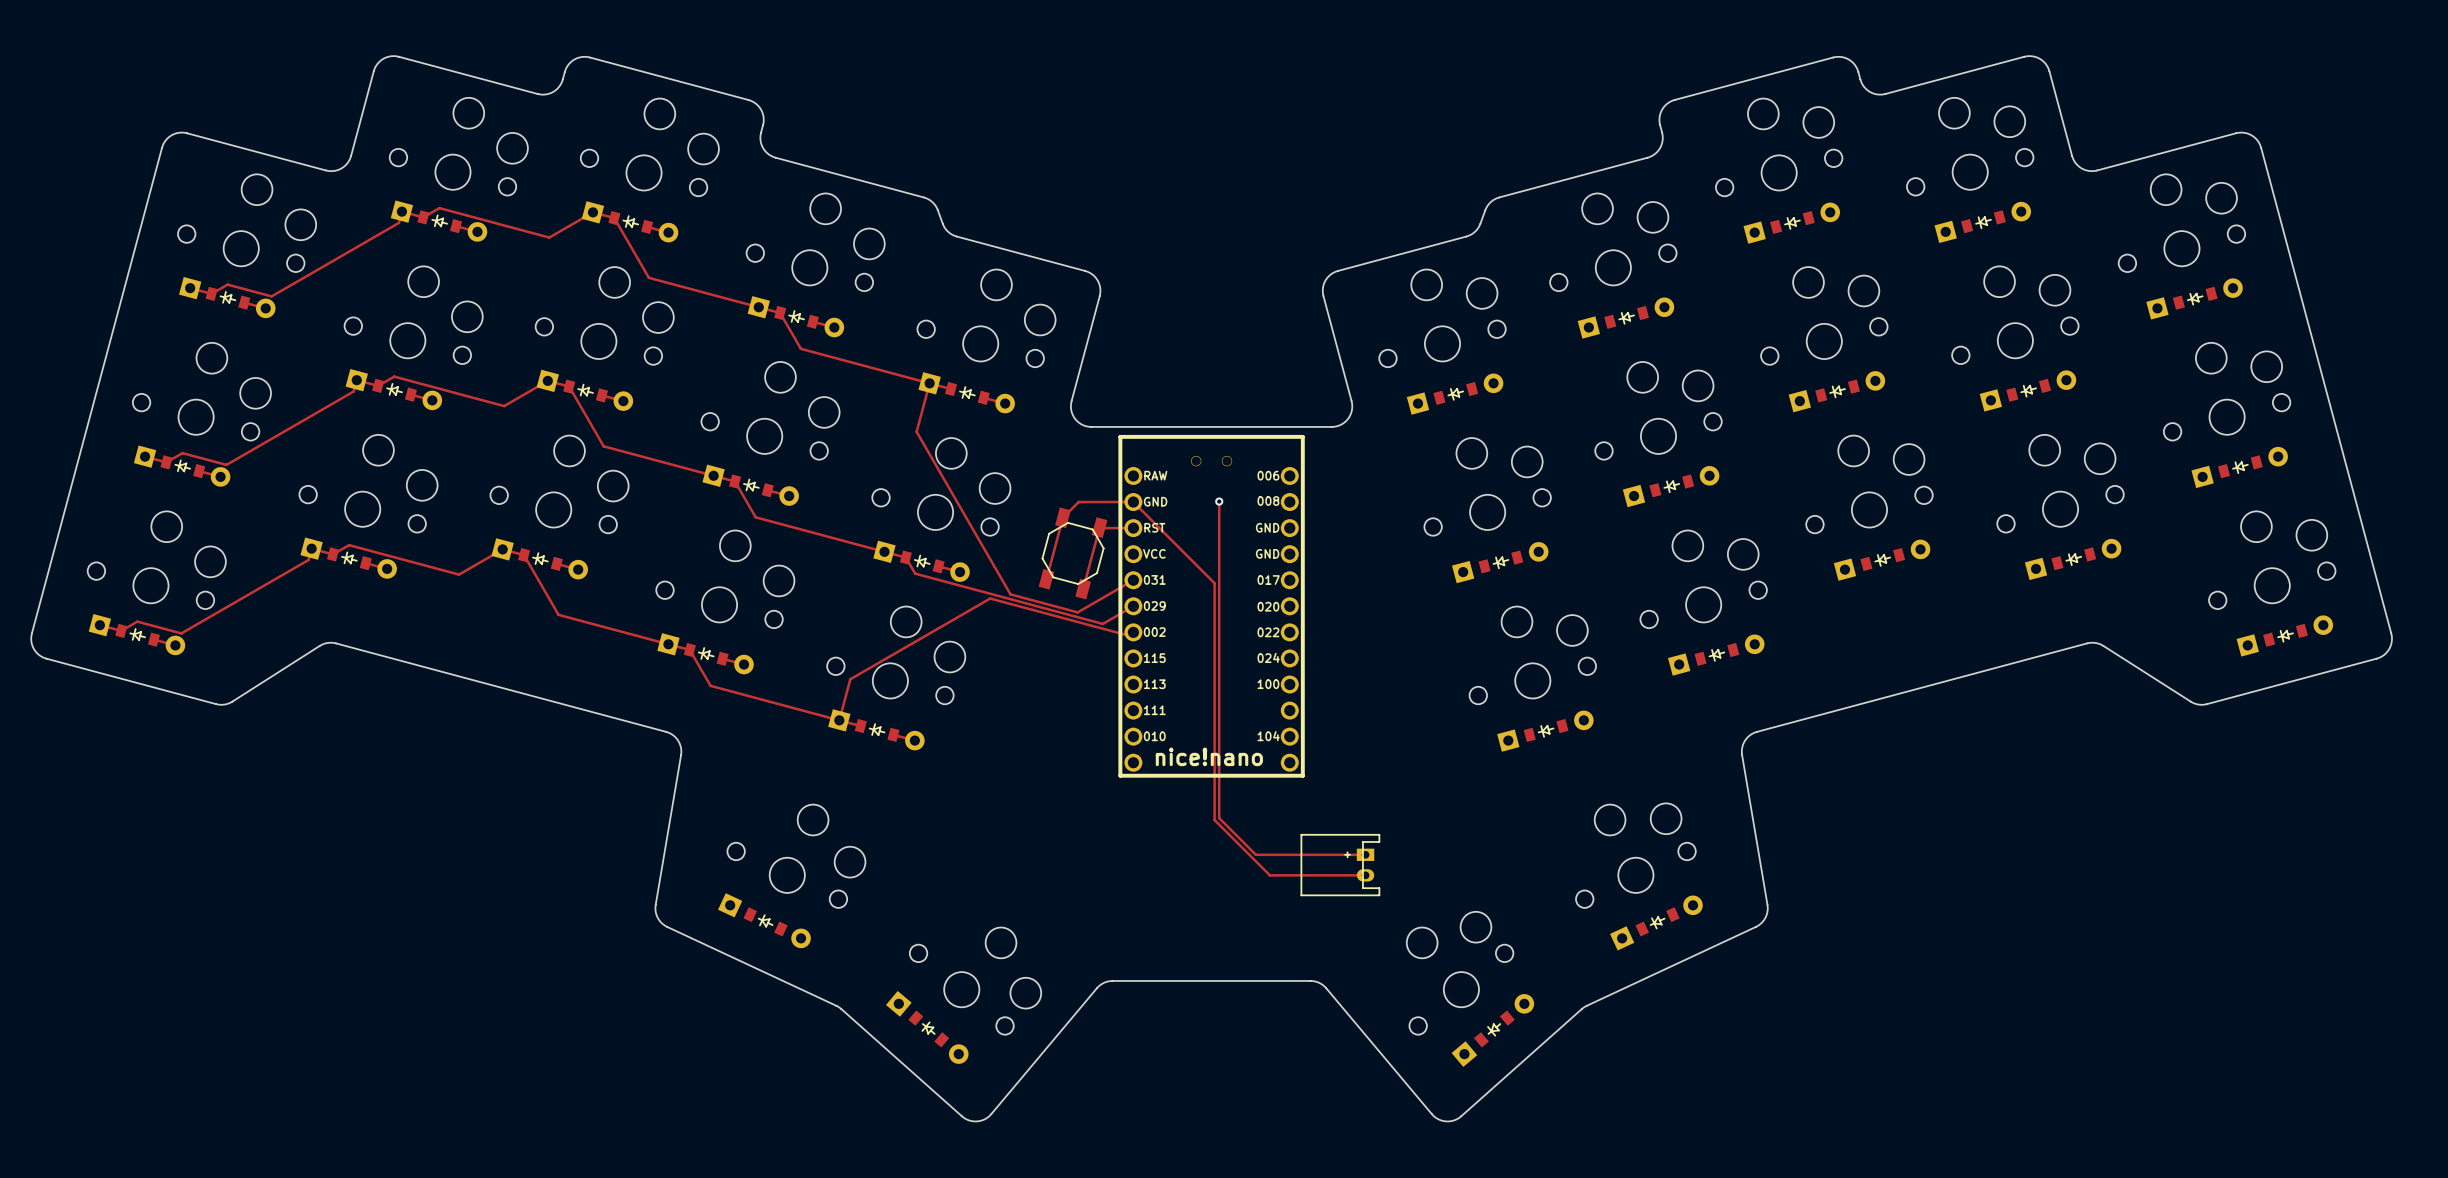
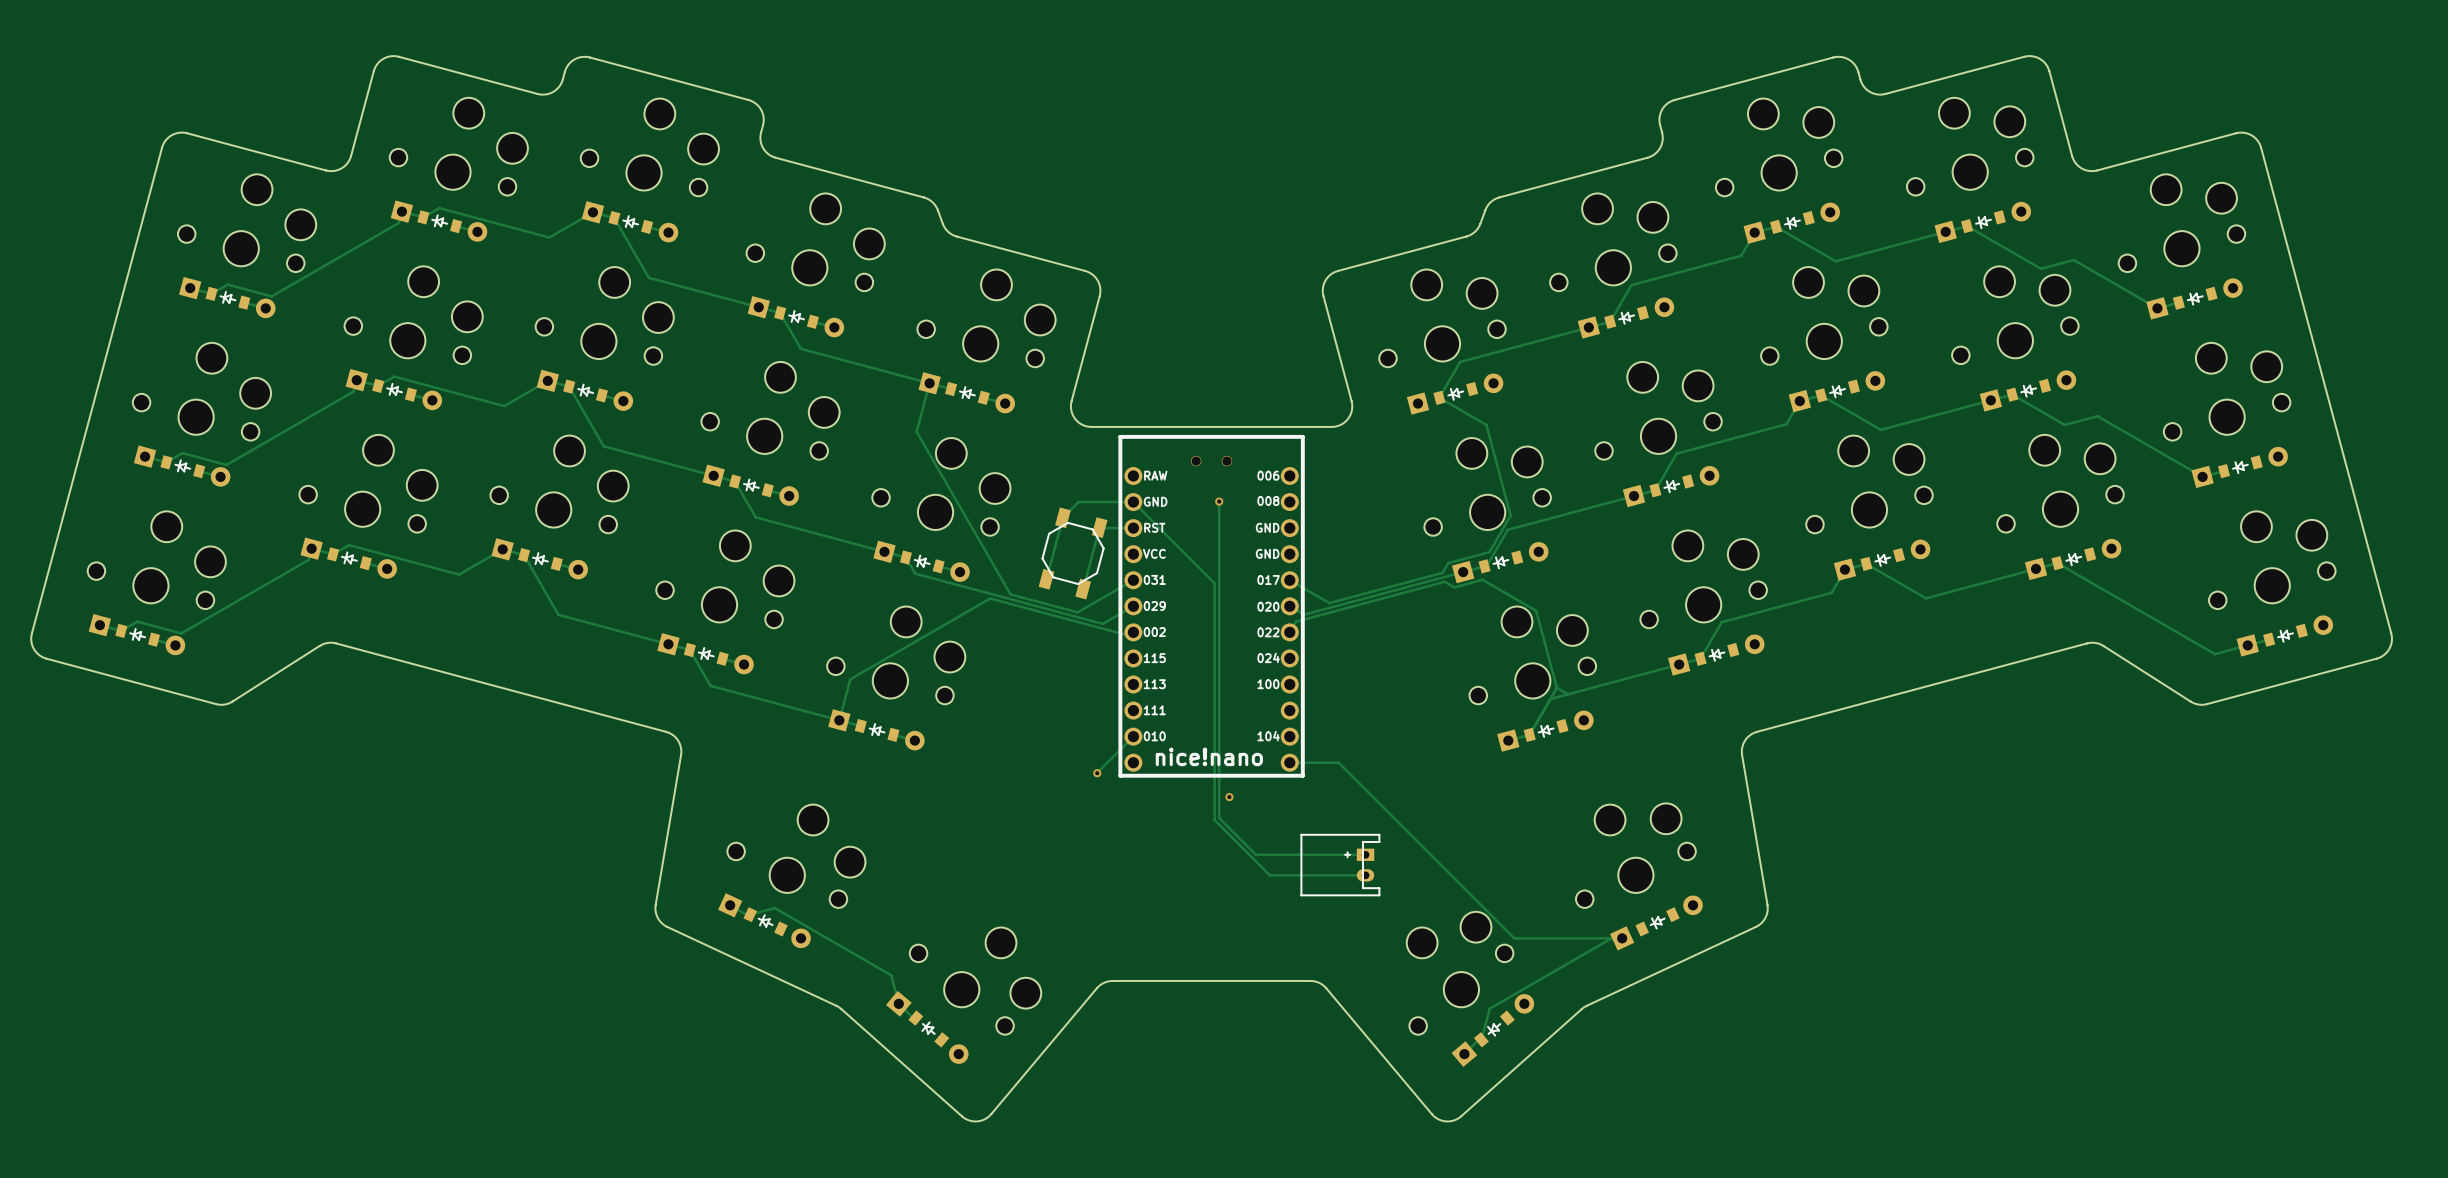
track: none -> (2178, 302) (2157, 308) (2073, 260) (2041, 268) (1967, 226) (1835, 261) (1776, 226) (1754, 232) (1741, 255) (1631, 285) (1610, 321) (1460, 362) (1439, 397) (1486, 424) (1510, 515) (1489, 552) (1448, 563) (1442, 572) (1329, 603) (1289, 580)
track: none -> (2224, 471) (2202, 476) (2097, 416) (2064, 424) (2012, 394) (1880, 429) (1821, 395) (1799, 401) (1786, 424) (1676, 453) (1655, 490) (1507, 529) (1487, 565) (1304, 614) (1289, 606)
track: none -> (1289, 632) (1295, 621) (1444, 581) (1454, 587) (1482, 579) (1536, 610) (1556, 687) (1529, 734) (1508, 740)
track: none -> (2269, 639) (2215, 654) (2057, 563) (1926, 598) (1866, 563) (1844, 569) (1831, 592) (1721, 622) (1700, 658) (1550, 699)
track: none -> (1556, 687) (1567, 694)
track: none -> (1133, 736) (1097, 773)
track: none -> (1289, 762) (1338, 762) (1514, 938) (1622, 938) (1614, 936) (1489, 1008) (1481, 1039) (1478, 1039) (1464, 1054)
via: none -> (1097, 773)
via: none -> (1229, 797)
track: none -> (730, 905) (747, 915) (774, 908) (891, 975) (898, 1003) (913, 1018) (915, 1018)

